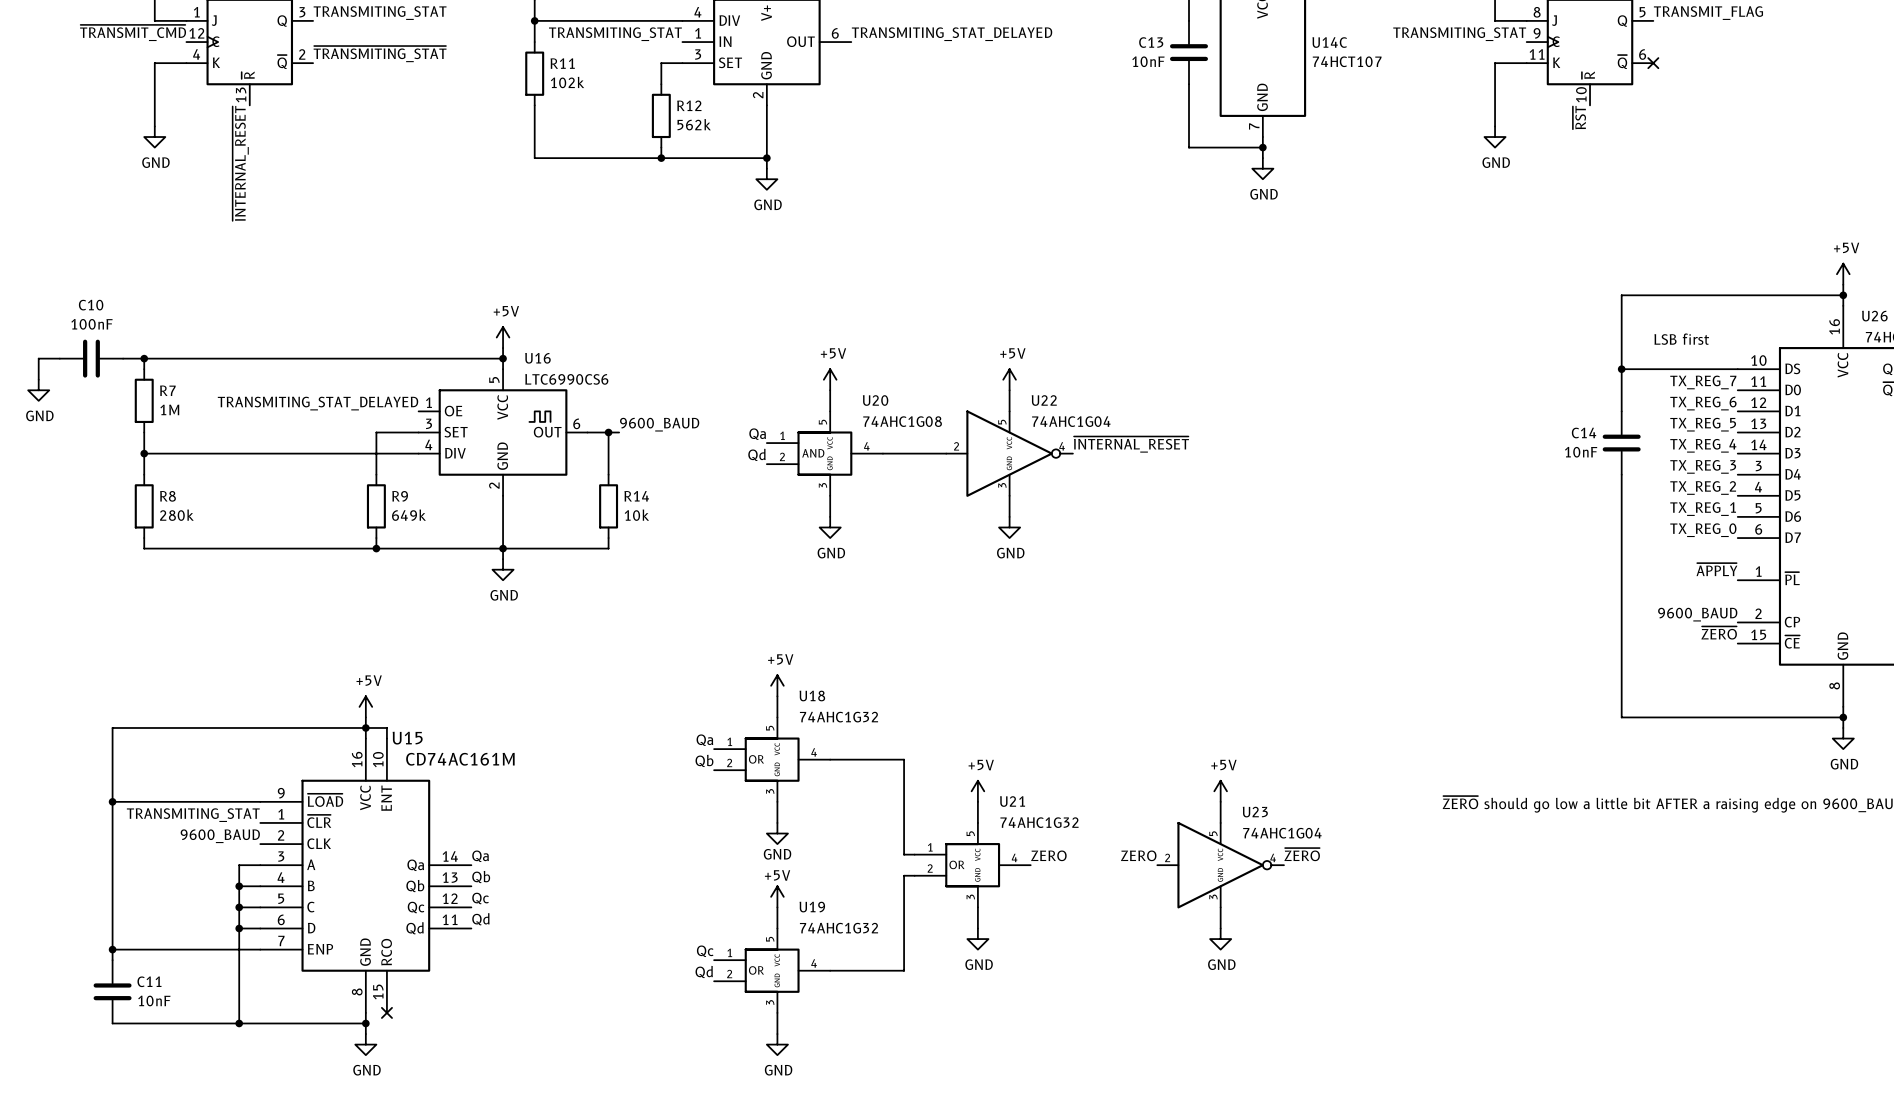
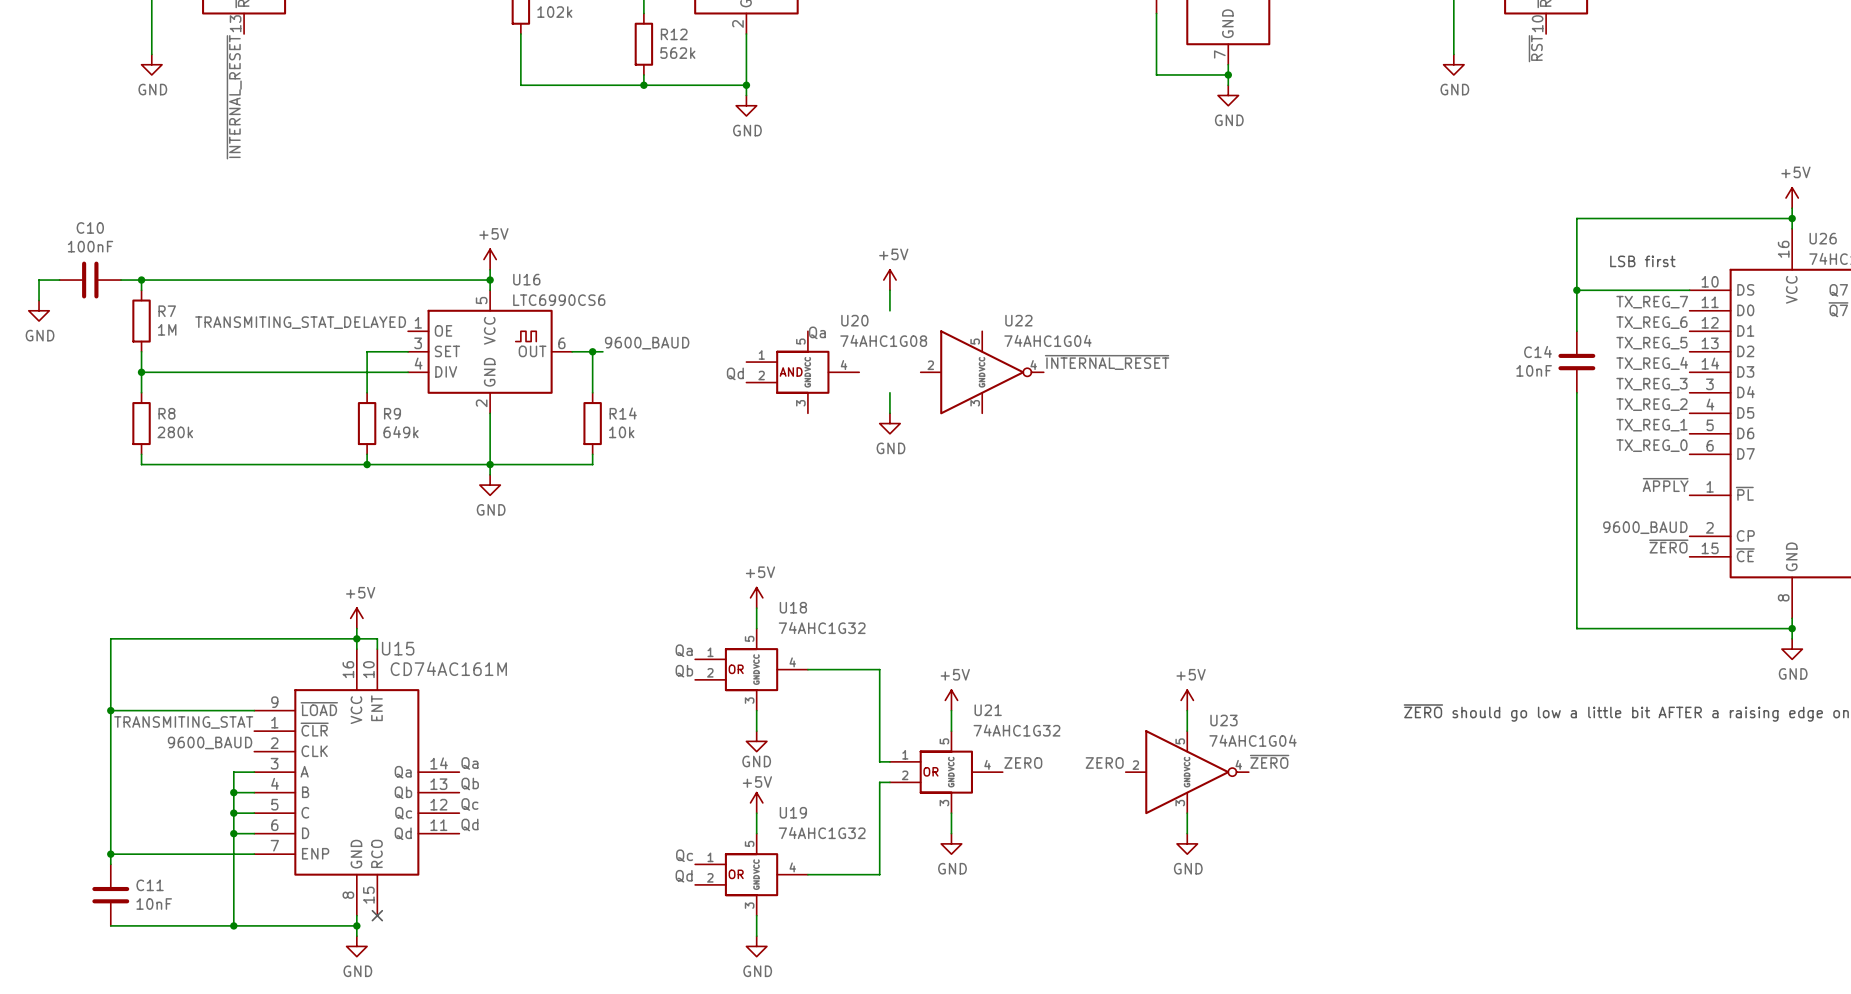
power symbol: none -> +5V (889, 280)
power symbol: +5V (830, 379) -> none
power symbol: +5V (1009, 379) -> none
wire: (830, 390) (830, 411) -> (889, 290) (889, 310)
wire: (1009, 390) (1009, 411) -> none
label position: Qa (757, 434) -> Qa (817, 332)
wire: (882, 453) (946, 453) -> none
wire: (830, 495) (830, 516) -> (889, 392) (889, 413)
wire: (1009, 495) (1009, 516) -> none
power symbol: none -> GND (889, 423)
power symbol: GND (830, 527) -> none
power symbol: GND (1009, 527) -> none

